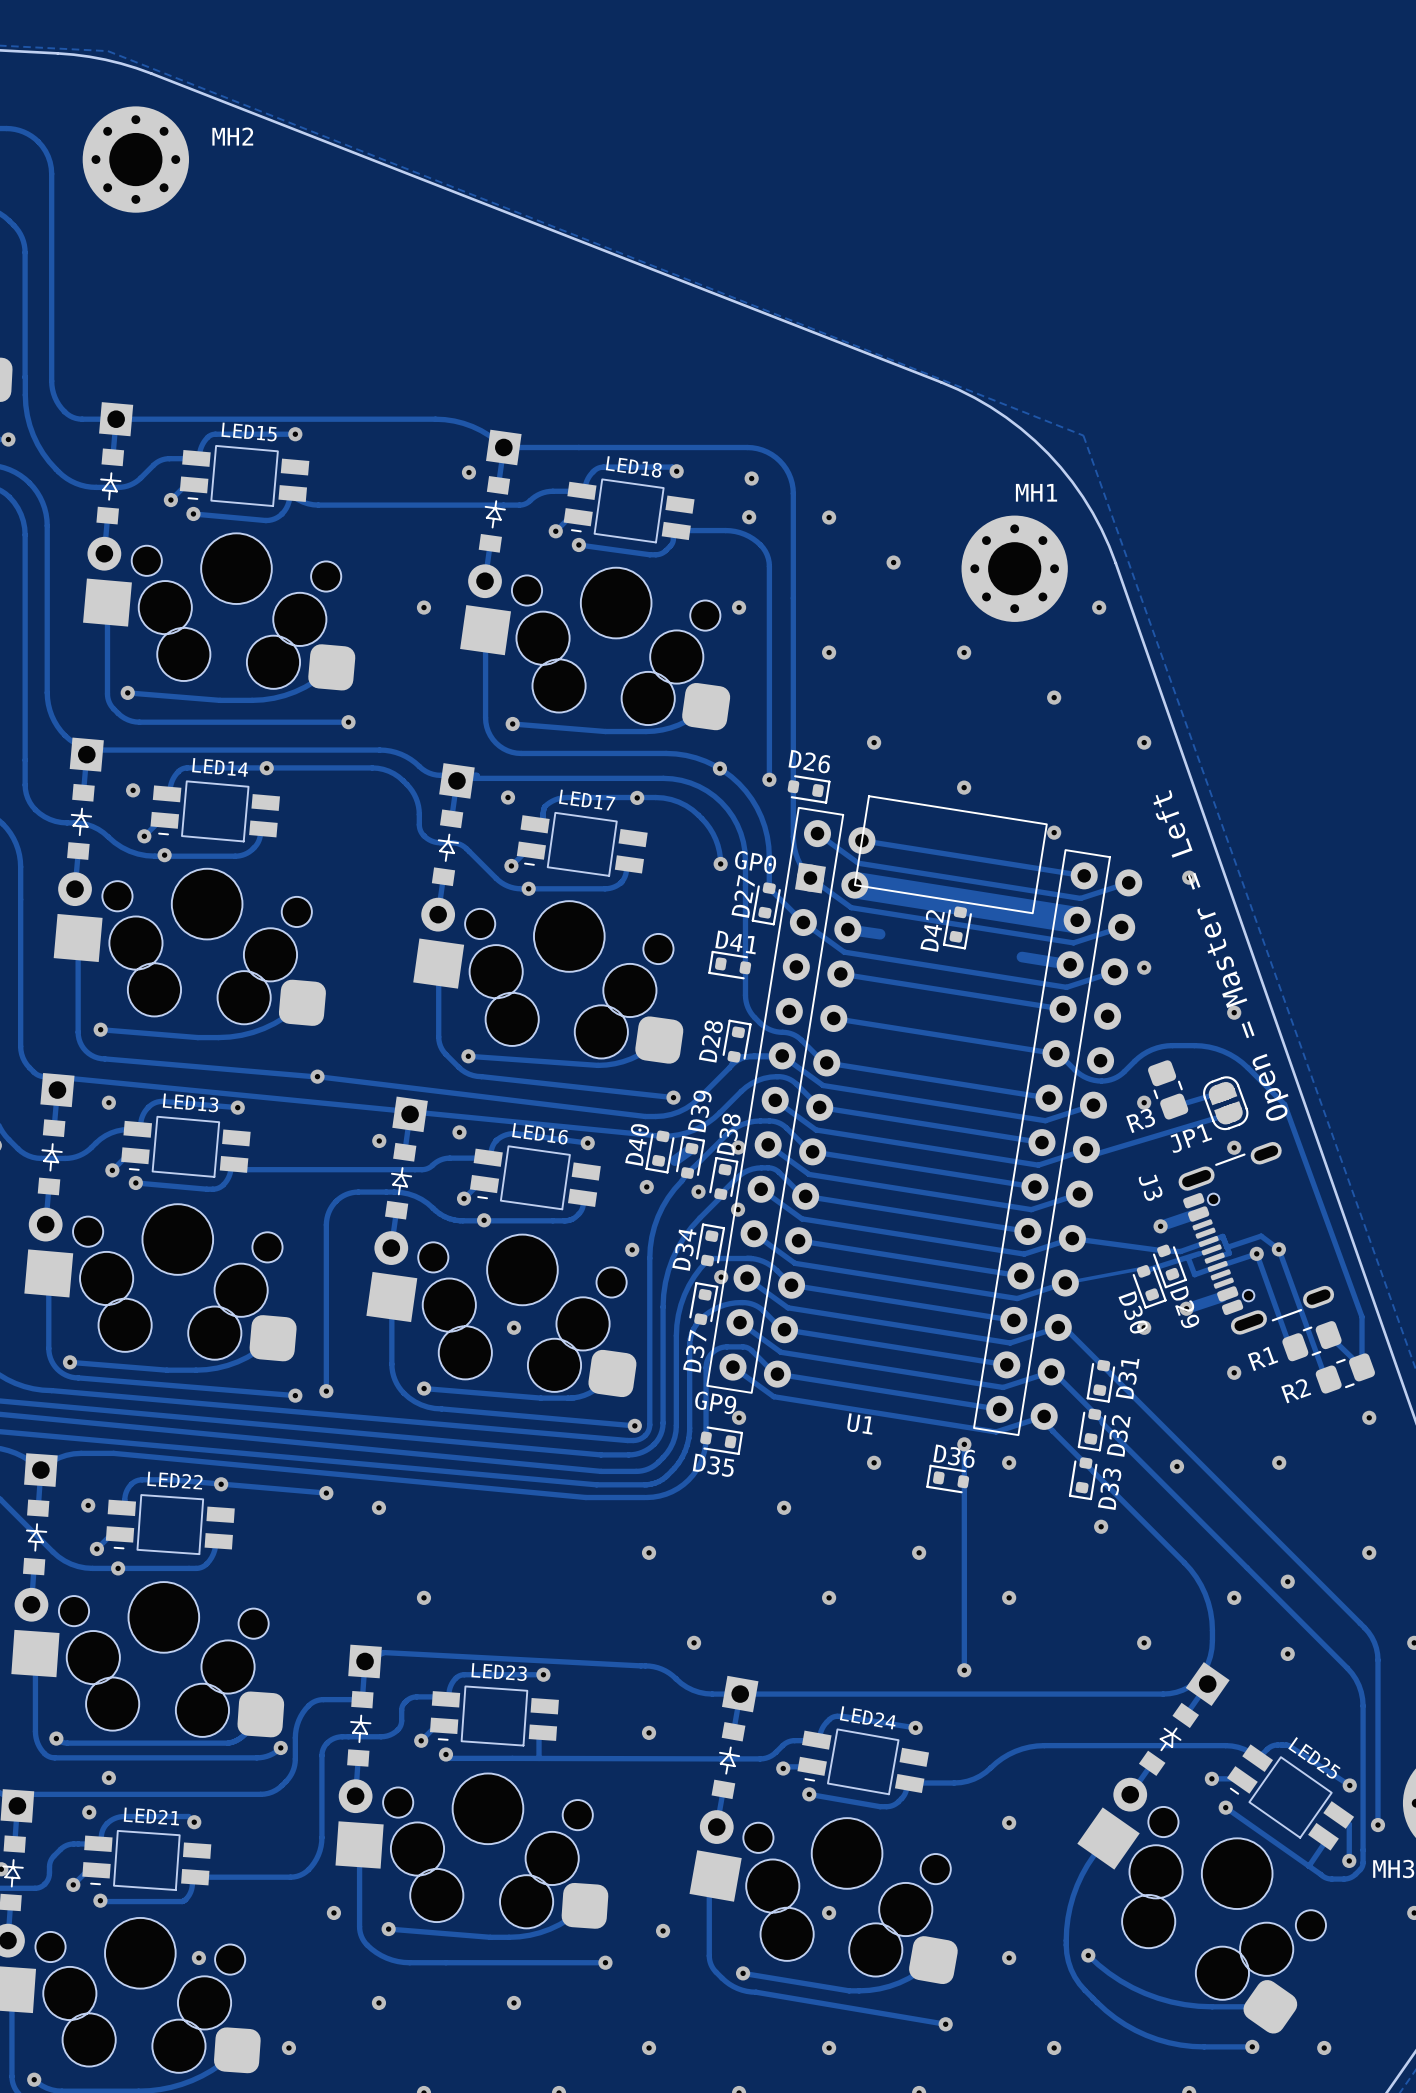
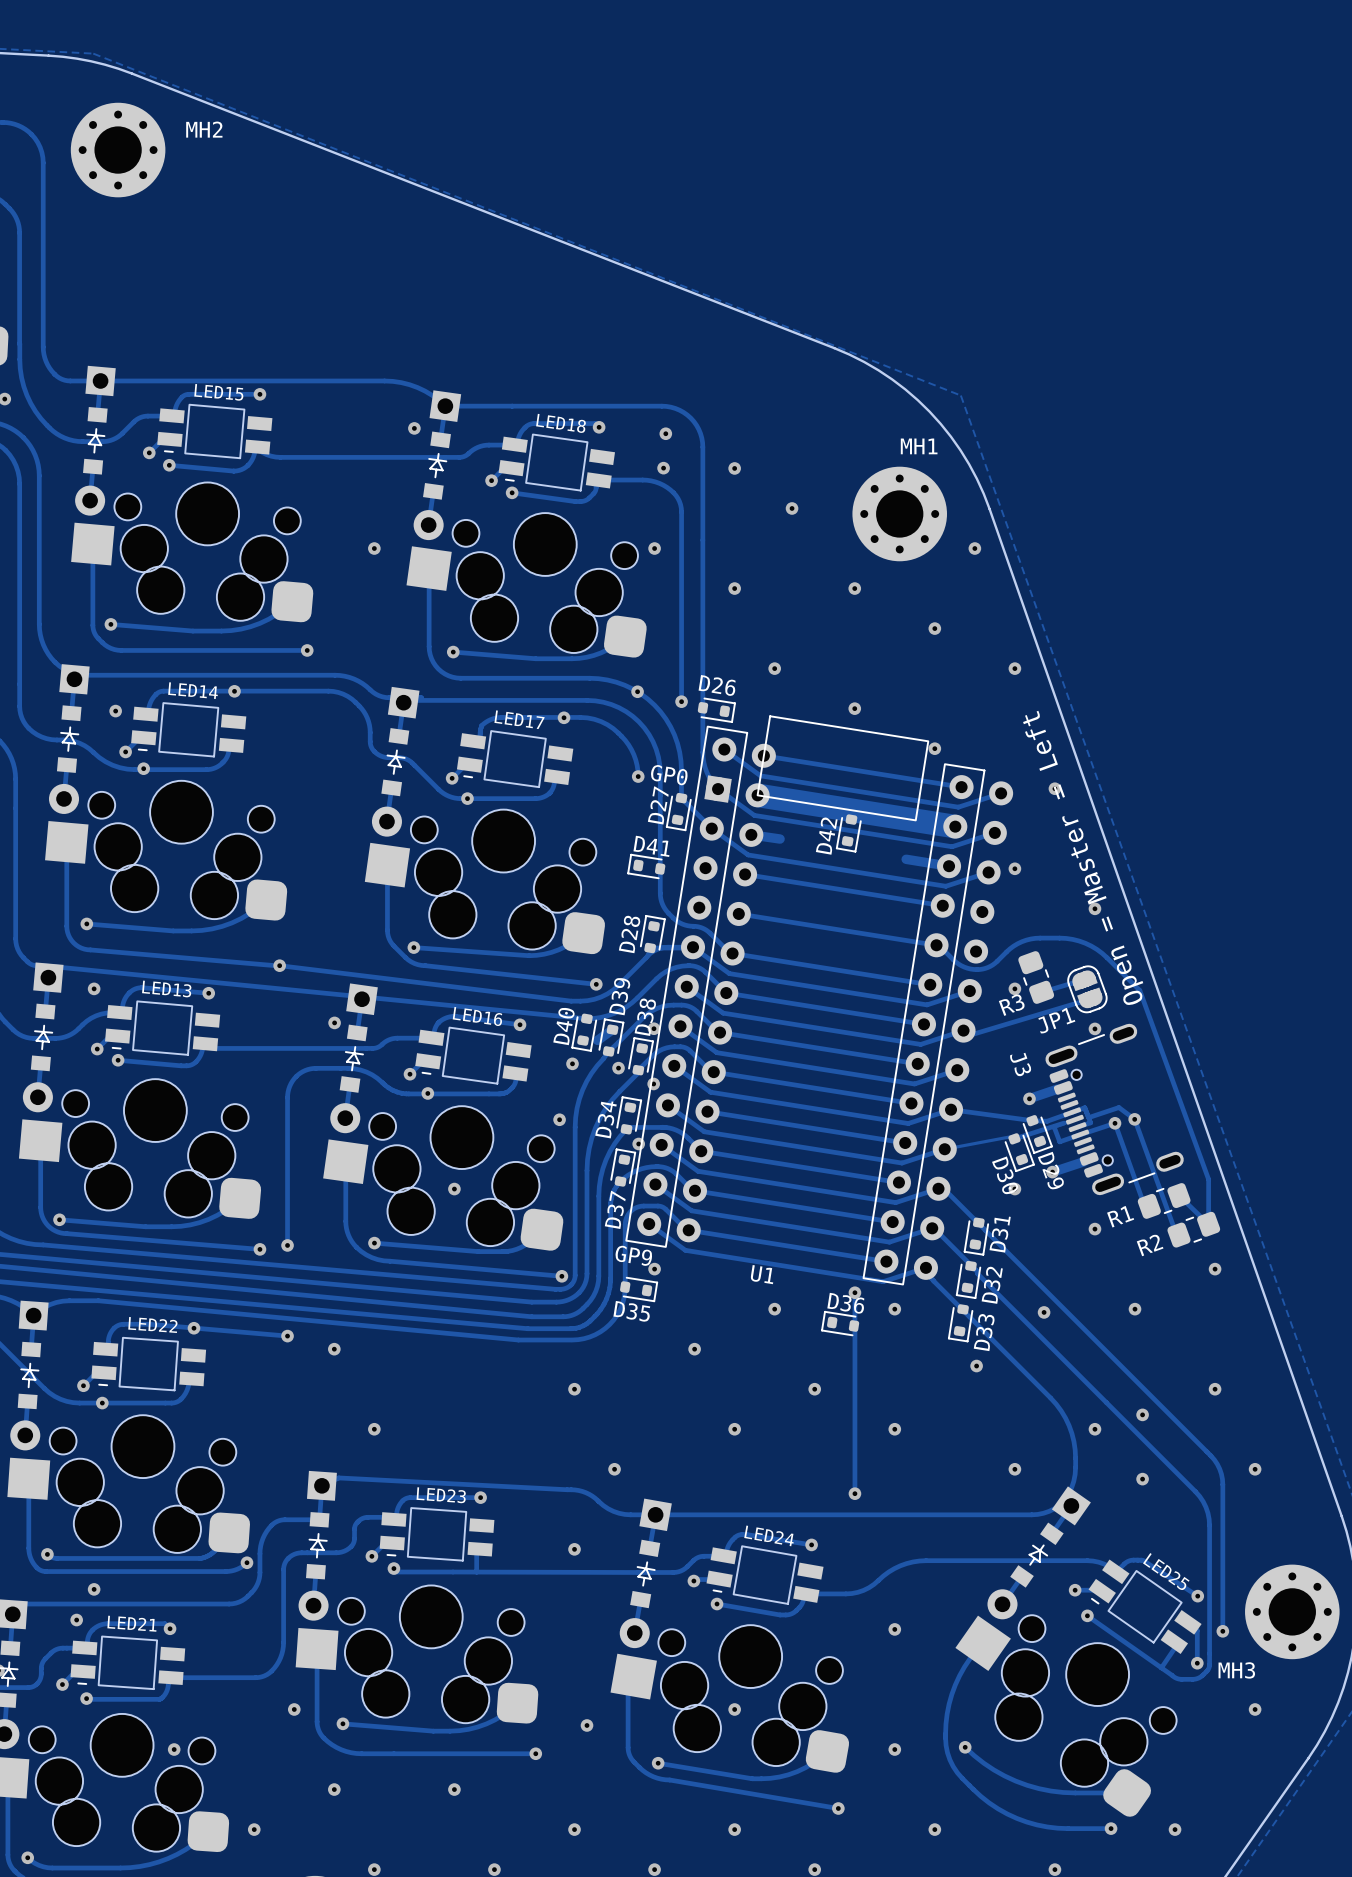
via: (508, 797) -> none
via: (459, 1132) -> none
via: (88, 1505) -> none

